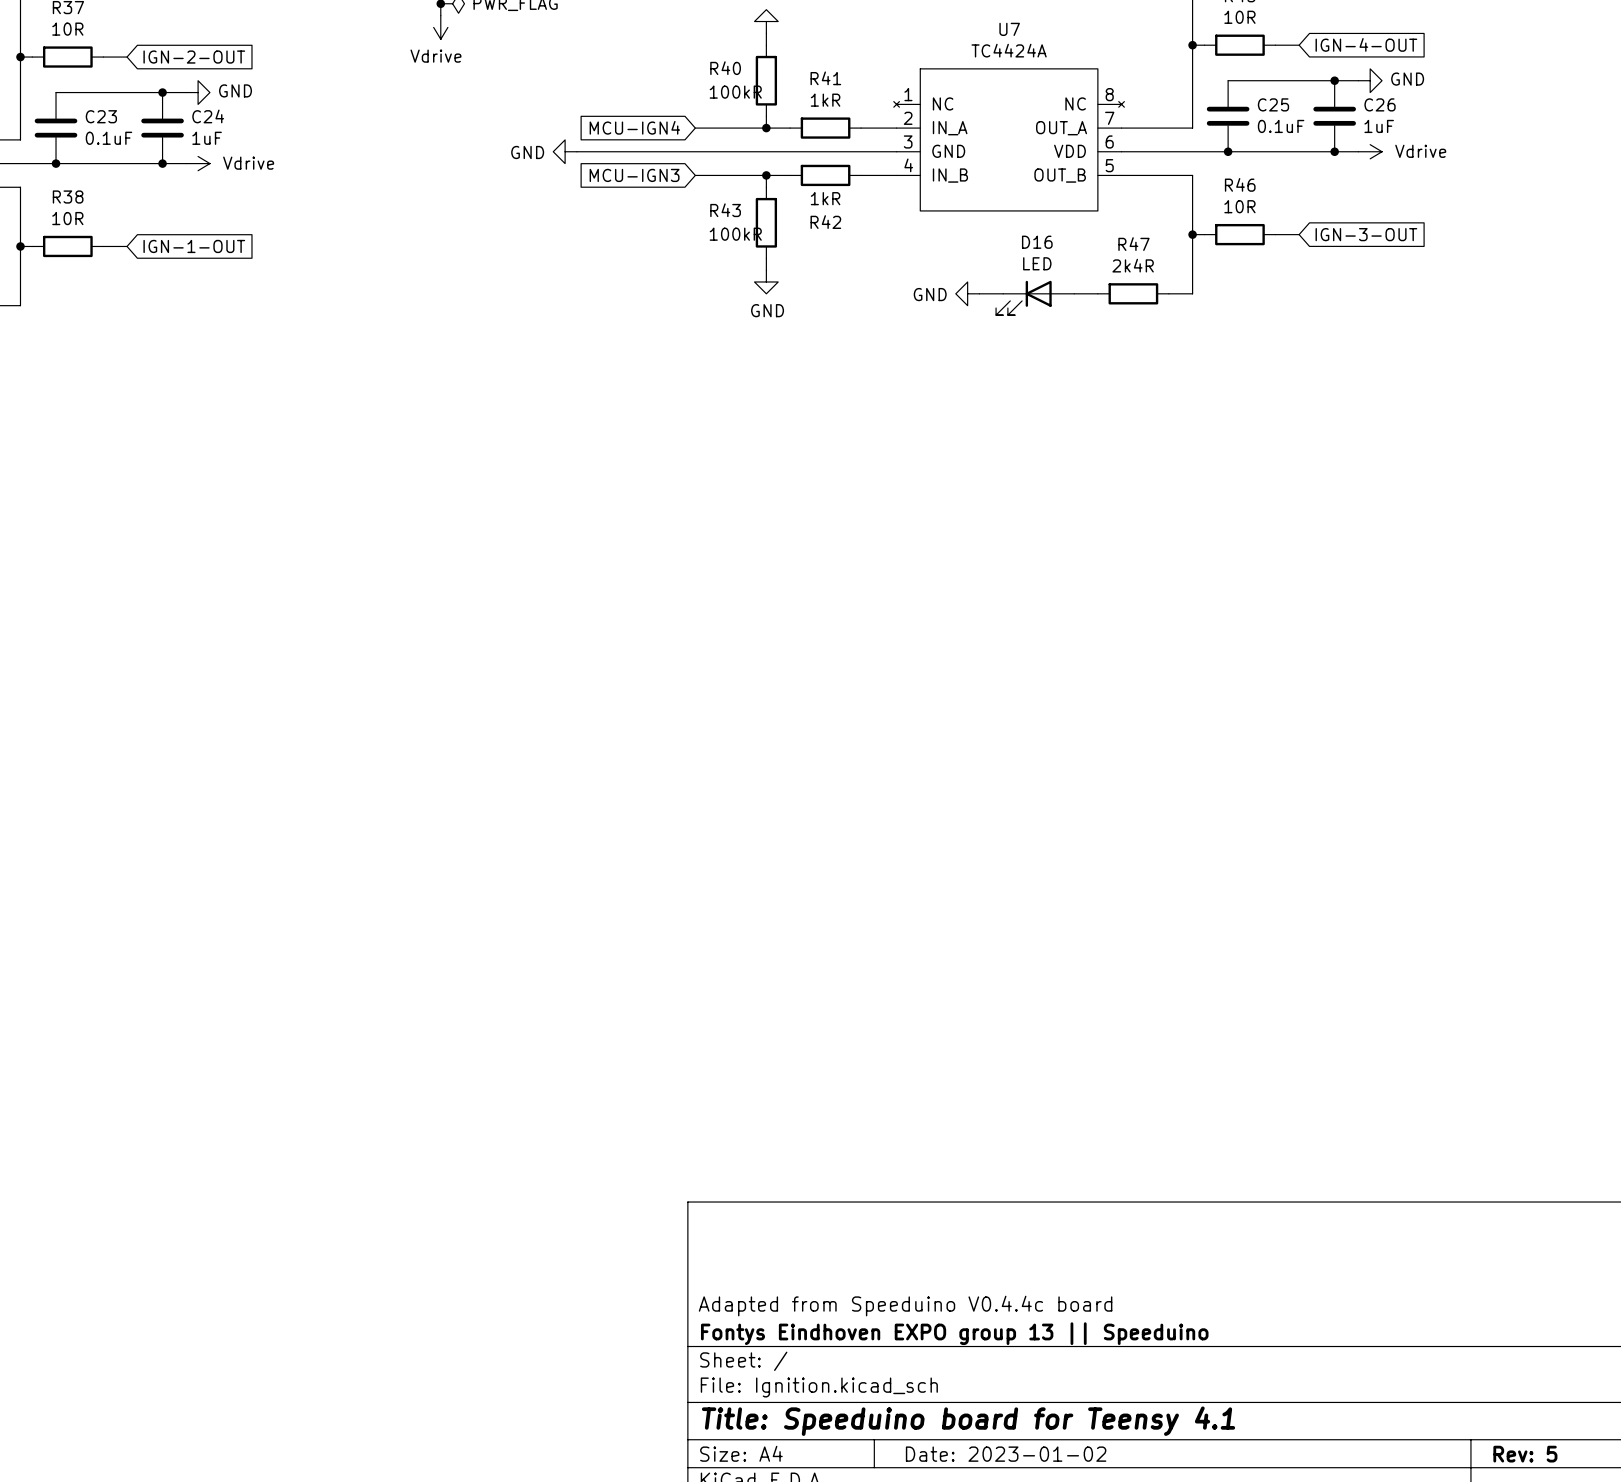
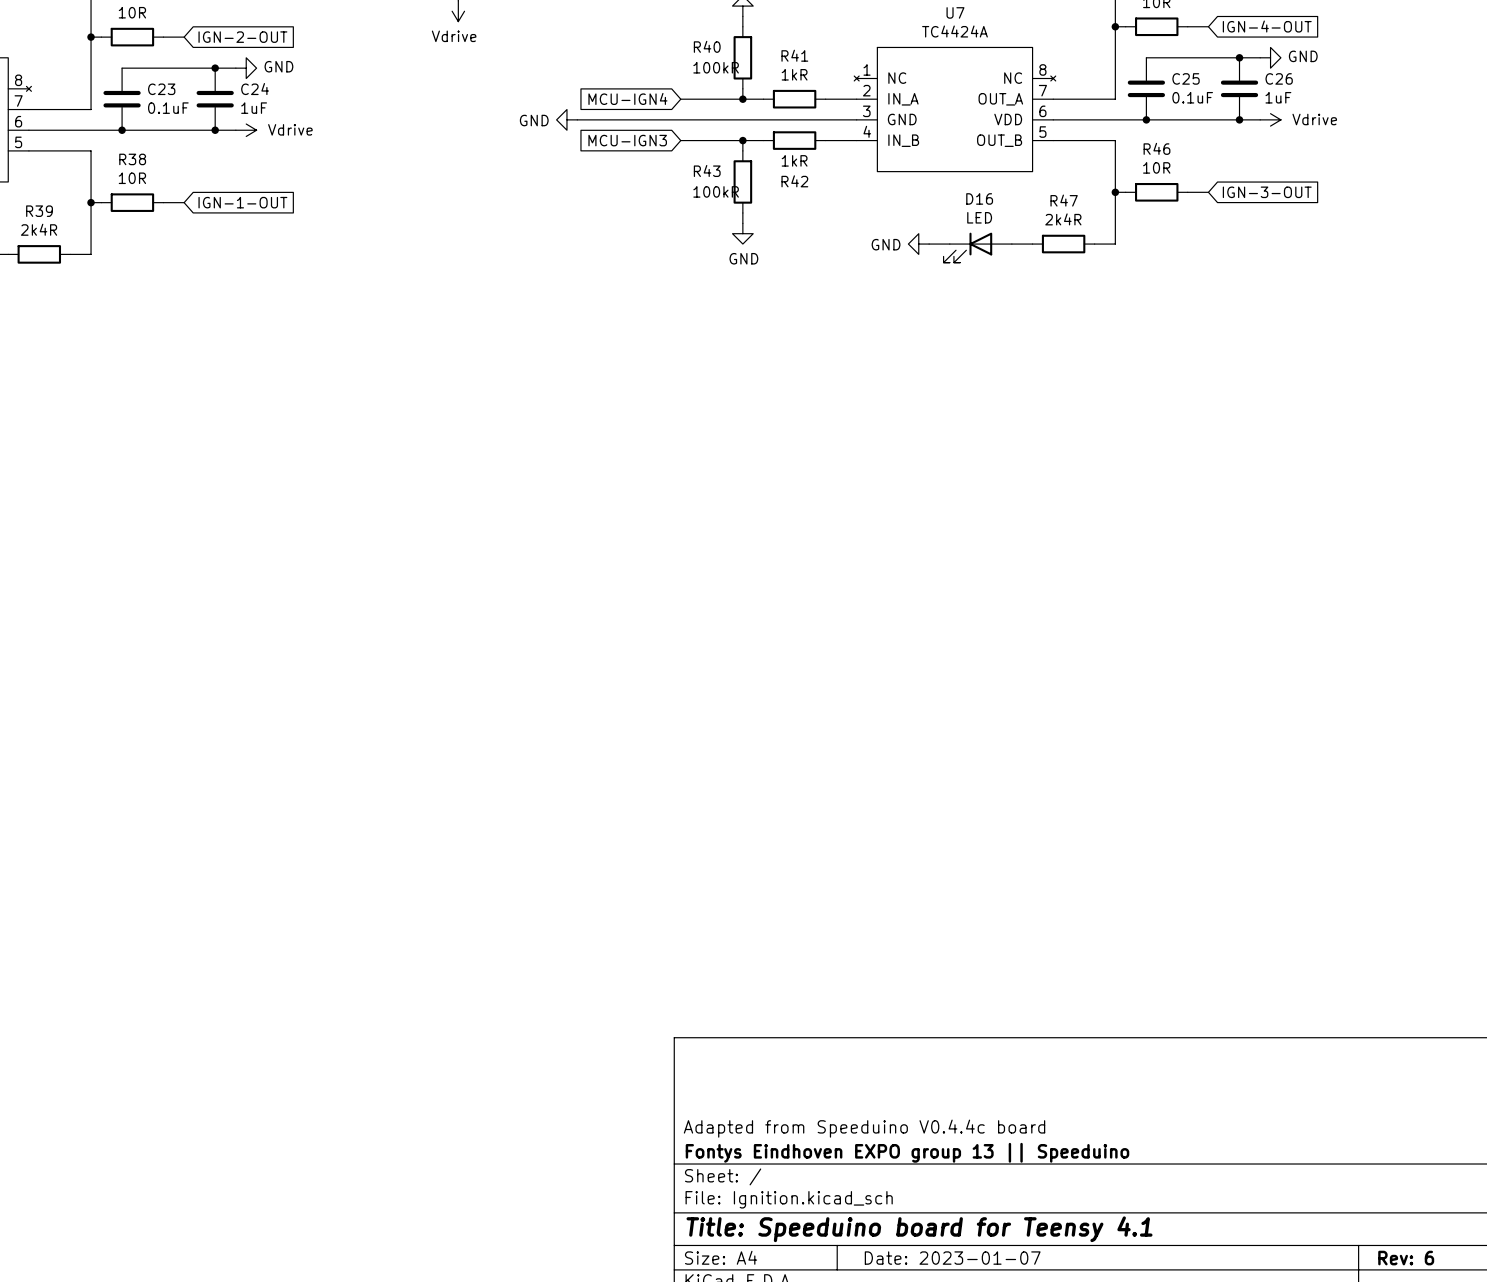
title block: Date: 2023-01-02 (1006, 1454) -> Date: 2023-01-07 (952, 1258)
title block: Rev: 5 (1525, 1454) -> Rev: 6 (1406, 1258)

